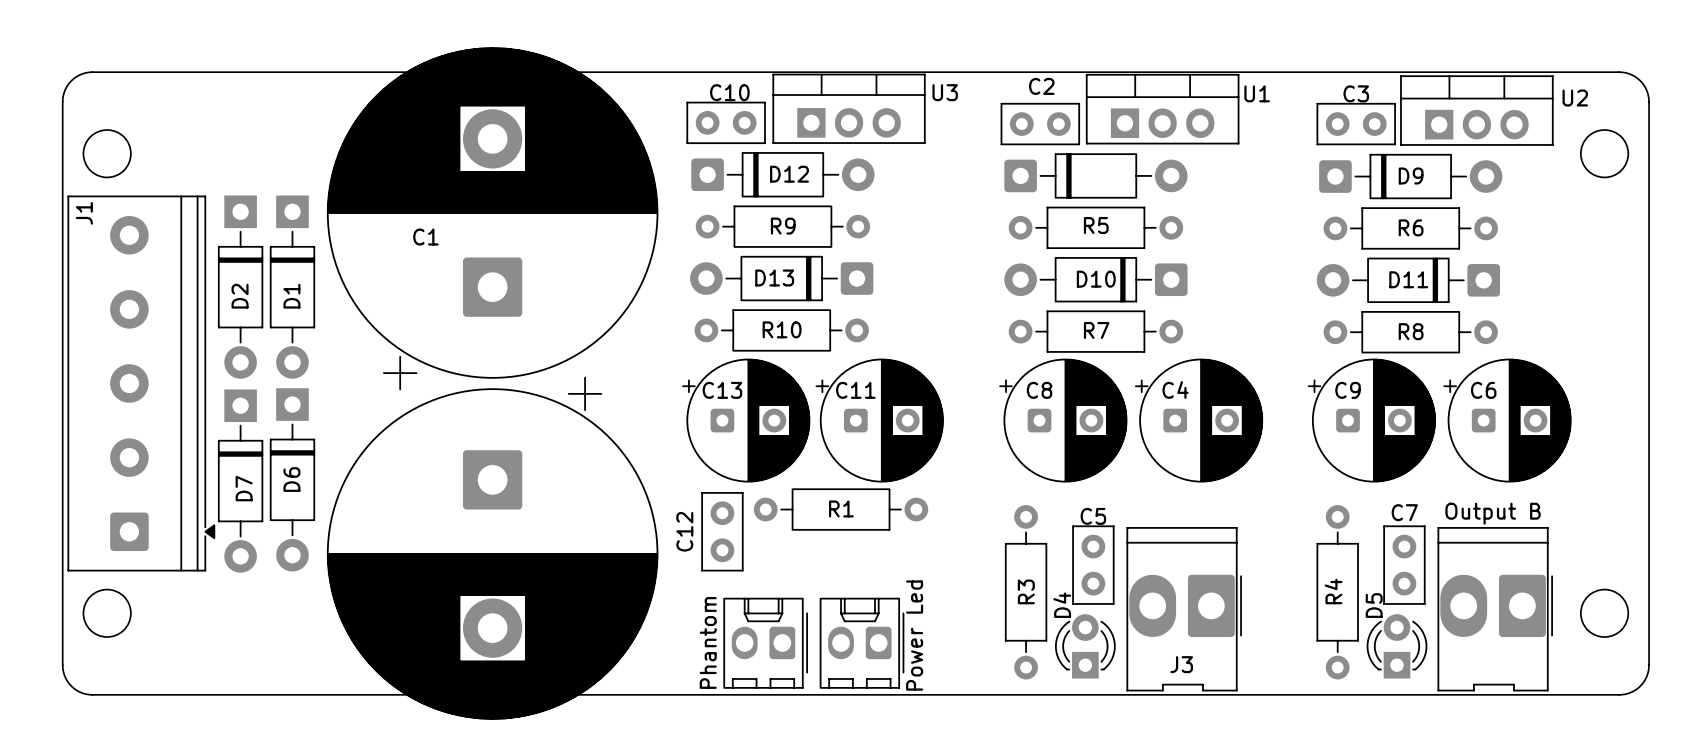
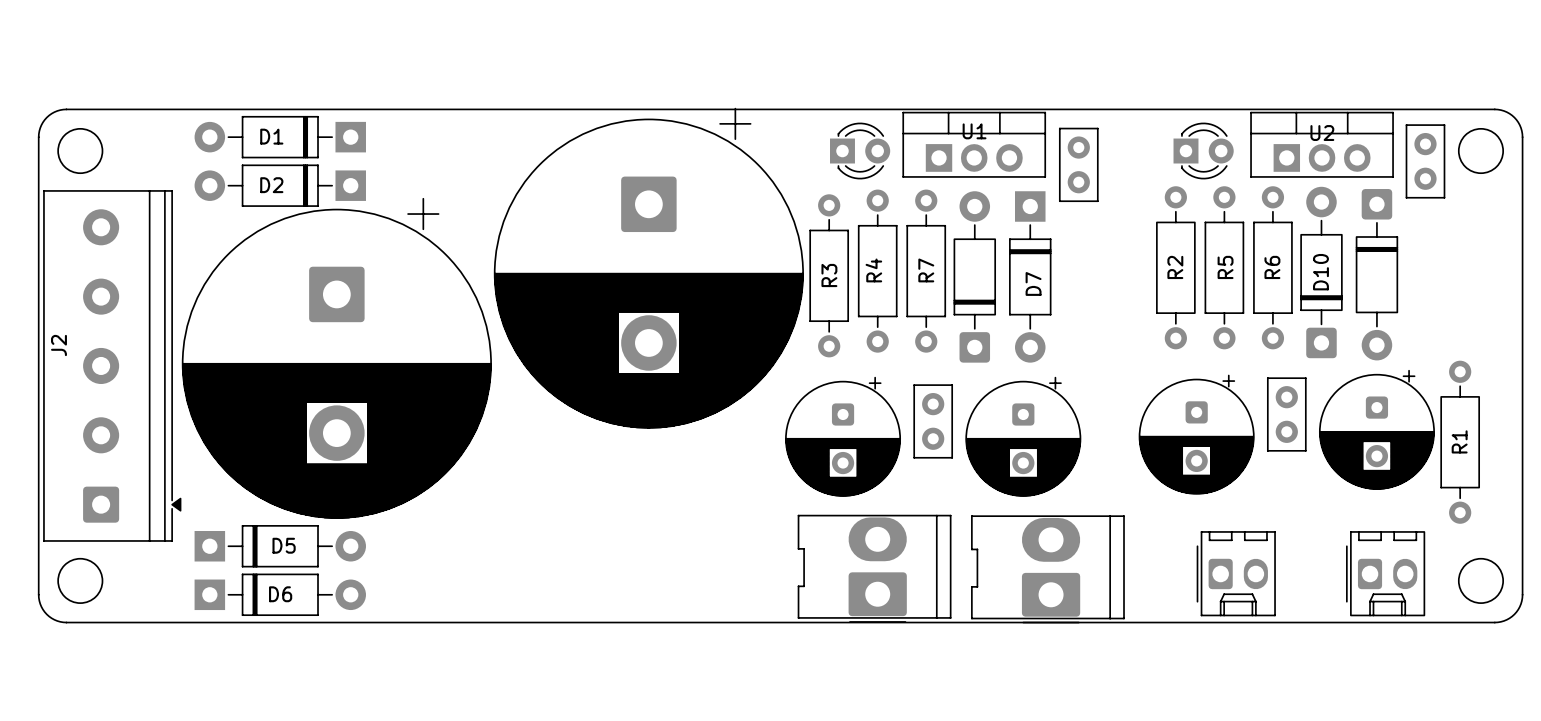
U1 name position: U1 (1257, 93) -> U1 (974, 131)
U2 name position: U2 (1575, 98) -> U2 (1322, 133)
U3: (849, 108) -> none
U1 position: (1162, 109) -> (974, 144)
U2 position: (1476, 110) -> (1322, 144)
C10: (726, 122) -> none
C2: (1040, 124) -> none
C3: (1356, 124) -> none
board edge: (62, 138) (62, 98) (65, 88) (76, 76) (92, 72) (1619, 72) (1635, 76) (1646, 88) (1648, 98) (1649, 138) -> (38, 137) (41, 125) (46, 117) (57, 110) (66, 109) (1494, 109) (1503, 110) (1514, 117) (1521, 127) (1522, 137)
part: none -> (860, 151)
part: none -> (1203, 151)
part: none -> (1425, 161)
part: none -> (1078, 164)
D12: (782, 174) -> none
part rotation: 0° (1095, 175) -> 90° counterclockwise (974, 276)
part position: (1095, 175) -> (974, 276)
D9: (1410, 176) -> none
J1 name: J1 (84, 213) -> J2 (58, 345)
C1: (492, 218) -> none
R9: (782, 226) -> none
R5 rotation: 0° (1095, 227) -> 90° clockwise (1224, 267)
R5 position: (1095, 227) -> (1224, 267)
R6 rotation: 0° (1410, 228) -> 90° clockwise (1272, 267)
D13: (781, 278) -> none
R2: none -> (1175, 267)
part: none -> (648, 268)
D10 rotation: 0° (1095, 279) -> 90° clockwise (1321, 272)
D10 position: (1095, 279) -> (1321, 272)
D11: (1408, 280) -> none
part: none -> (1376, 274)
D2 rotation: 0° (240, 287) -> 90° clockwise (280, 185)
D2 position: (240, 287) -> (280, 185)
D1 rotation: 0° (292, 287) -> 90° clockwise (280, 137)
D1 position: (292, 287) -> (280, 137)
R10: (781, 330) -> none
R7 rotation: 0° (1095, 331) -> 90° clockwise (926, 271)
R8: (1410, 332) -> none
part: none -> (336, 358)
C13: (746, 420) -> none
C11: (879, 420) -> none
C8: (1063, 420) -> none
C4: (1199, 420) -> none
C9: (1371, 420) -> none
C6: (1507, 420) -> none
part: none -> (1286, 414)
part: none -> (933, 421)
part: none -> (1376, 429)
part: none -> (1196, 434)
part: none -> (843, 436)
part: none -> (1023, 436)
D6 rotation: 0° (292, 479) -> 90° counterclockwise (280, 594)
D6 position: (292, 479) -> (280, 594)
D7 position: (240, 481) -> (1030, 276)
R1 rotation: 0° (841, 509) -> 90° clockwise (1460, 442)
R1 position: (841, 509) -> (1460, 442)
part value: Output B (1493, 513) -> none
part footprint: [1437, 527, 1553, 692] -> [1346, 531, 1426, 617]
C12: (722, 531) -> none
part: (492, 548) -> none
C5: (1093, 565) -> none
C7: (1404, 565) -> none
R3 position: (1026, 592) -> (829, 275)
R4 position: (1337, 592) -> (877, 271)
part: none -> (874, 568)
part: none -> (1047, 569)
part: none -> (1236, 573)
D5 name position: D5 (1374, 605) -> D5 (284, 545)
J3: (1184, 609) -> none
D5 footprint: [1366, 614, 1428, 679] -> [194, 525, 366, 568]
board edge: (62, 628) (62, 668) (65, 678) (76, 690) (92, 694) (1619, 694) (1635, 690) (1646, 678) (1648, 668) (1649, 628) -> (38, 594) (40, 603) (46, 614) (57, 620) (66, 622) (1494, 622) (1506, 619) (1514, 614) (1521, 603) (1522, 594)
part: Phantom (765, 643) -> none
part: Power Led (862, 643) -> none
D4: (1085, 646) -> none

